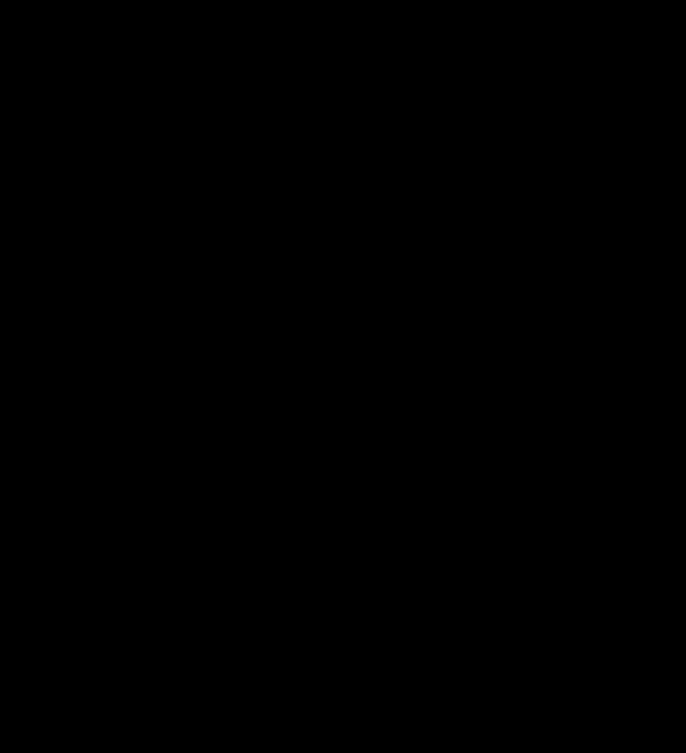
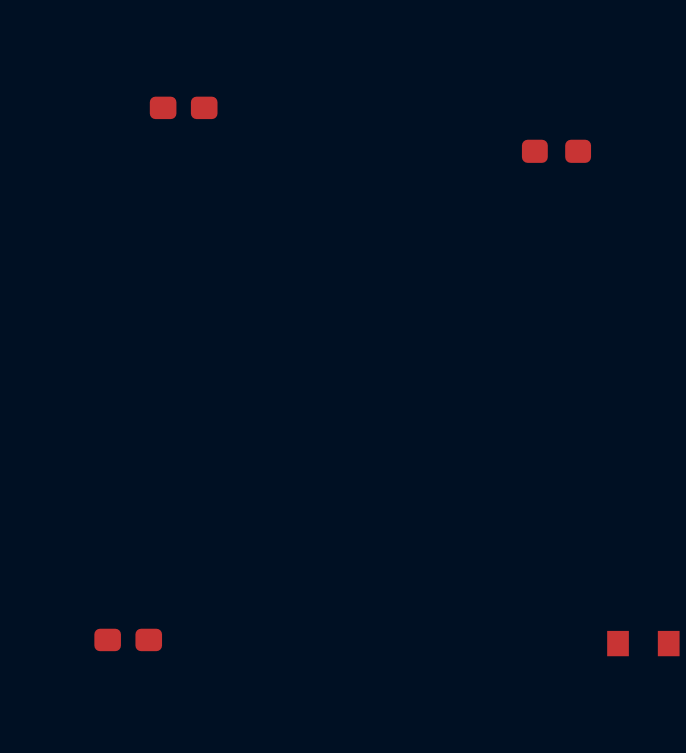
part: none -> (183, 107)
part: none -> (556, 151)
part: none -> (128, 639)
part: none -> (643, 643)

